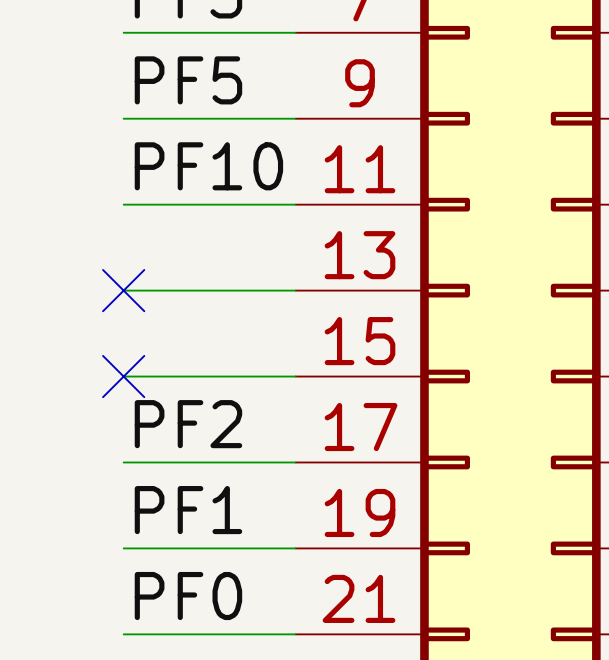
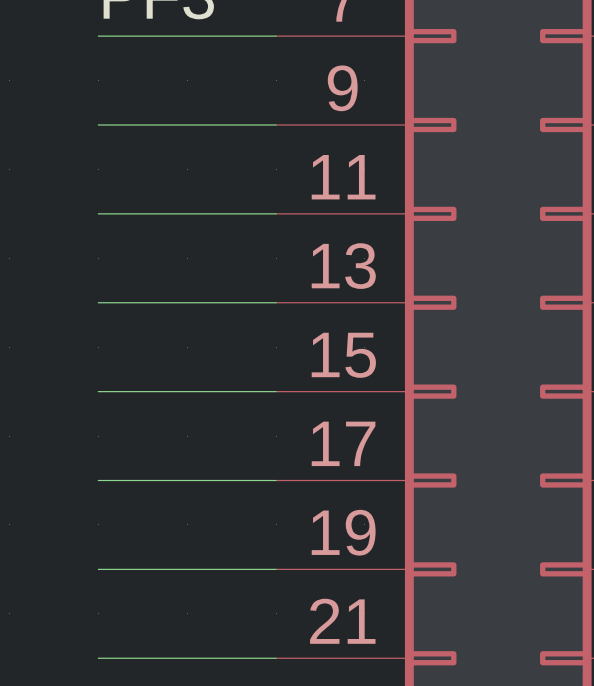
label: PF5 (188, 80) -> none
label: PF10 (208, 166) -> none
no-connect mark: (123, 290) -> none
no-connect mark: (123, 376) -> none
label: PF2 (188, 424) -> none
label: PF1 (188, 510) -> none
label: PF0 (188, 596) -> none

